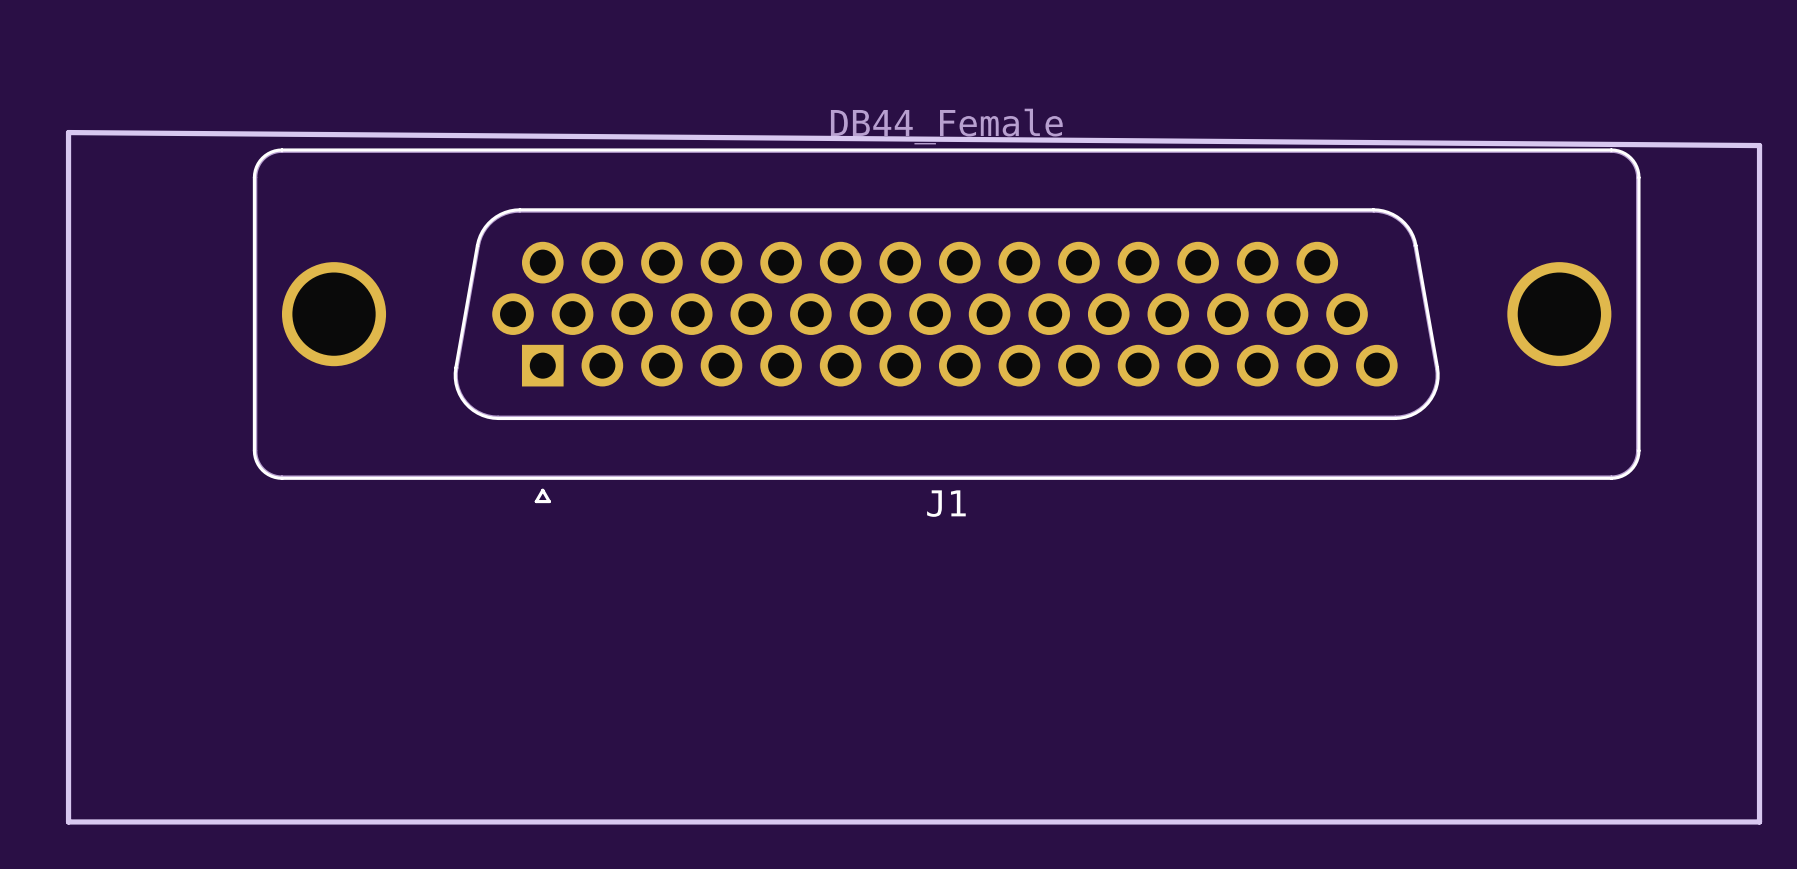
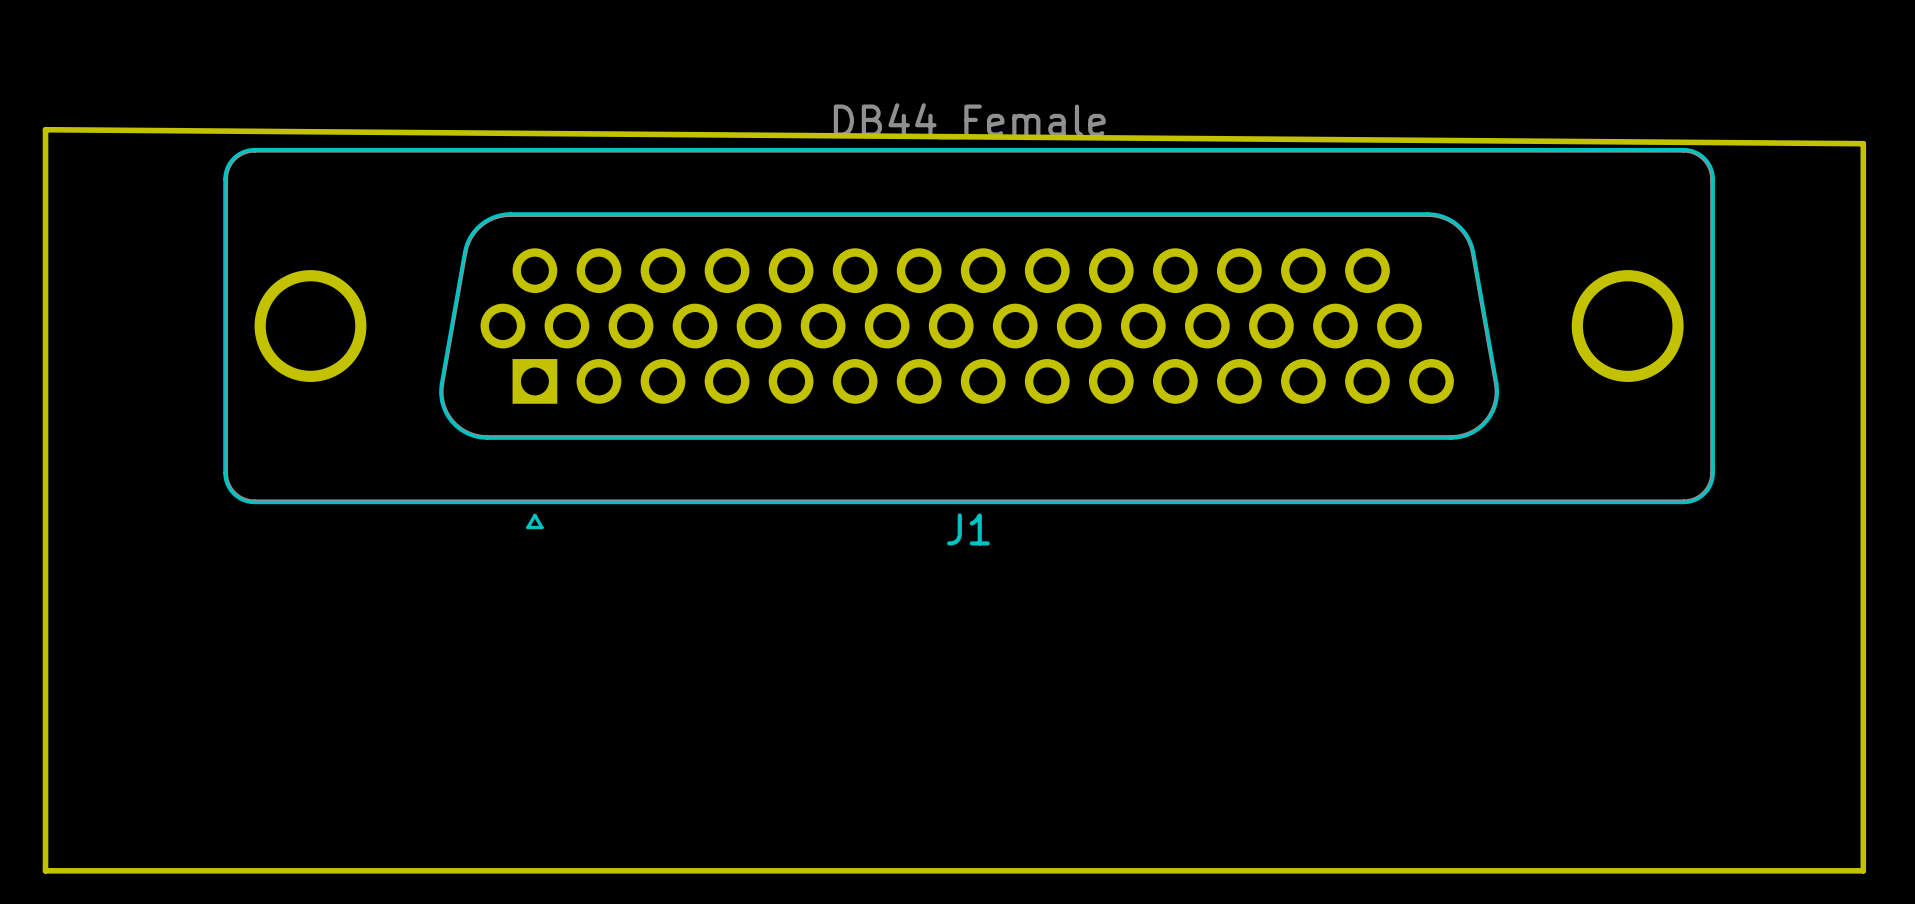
J1 position: (946, 325) -> (969, 338)

